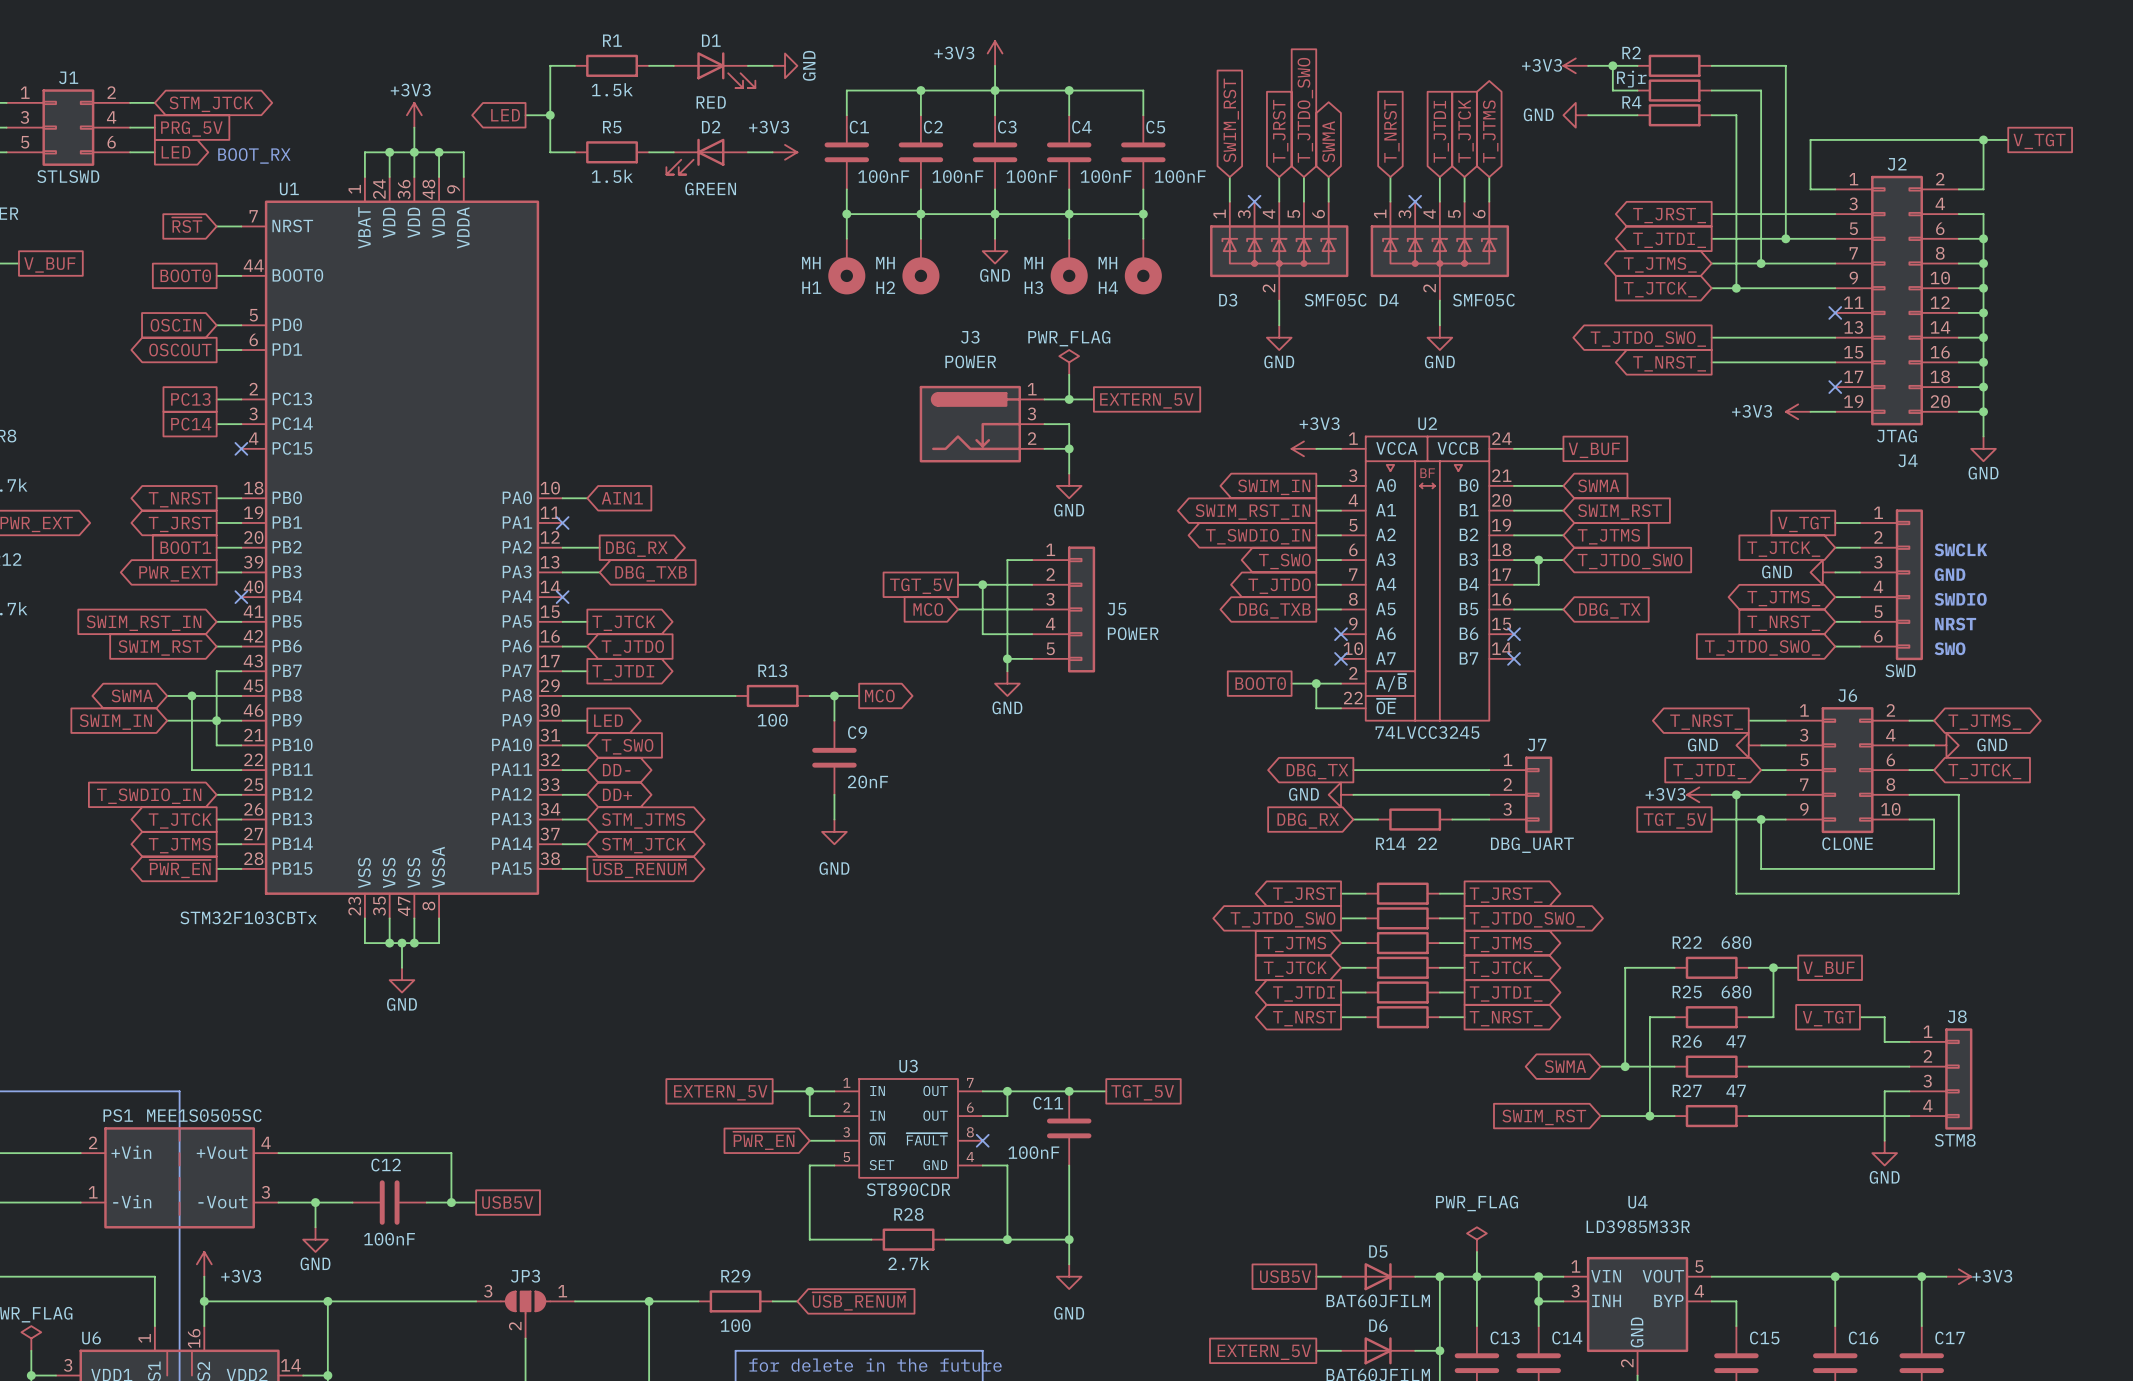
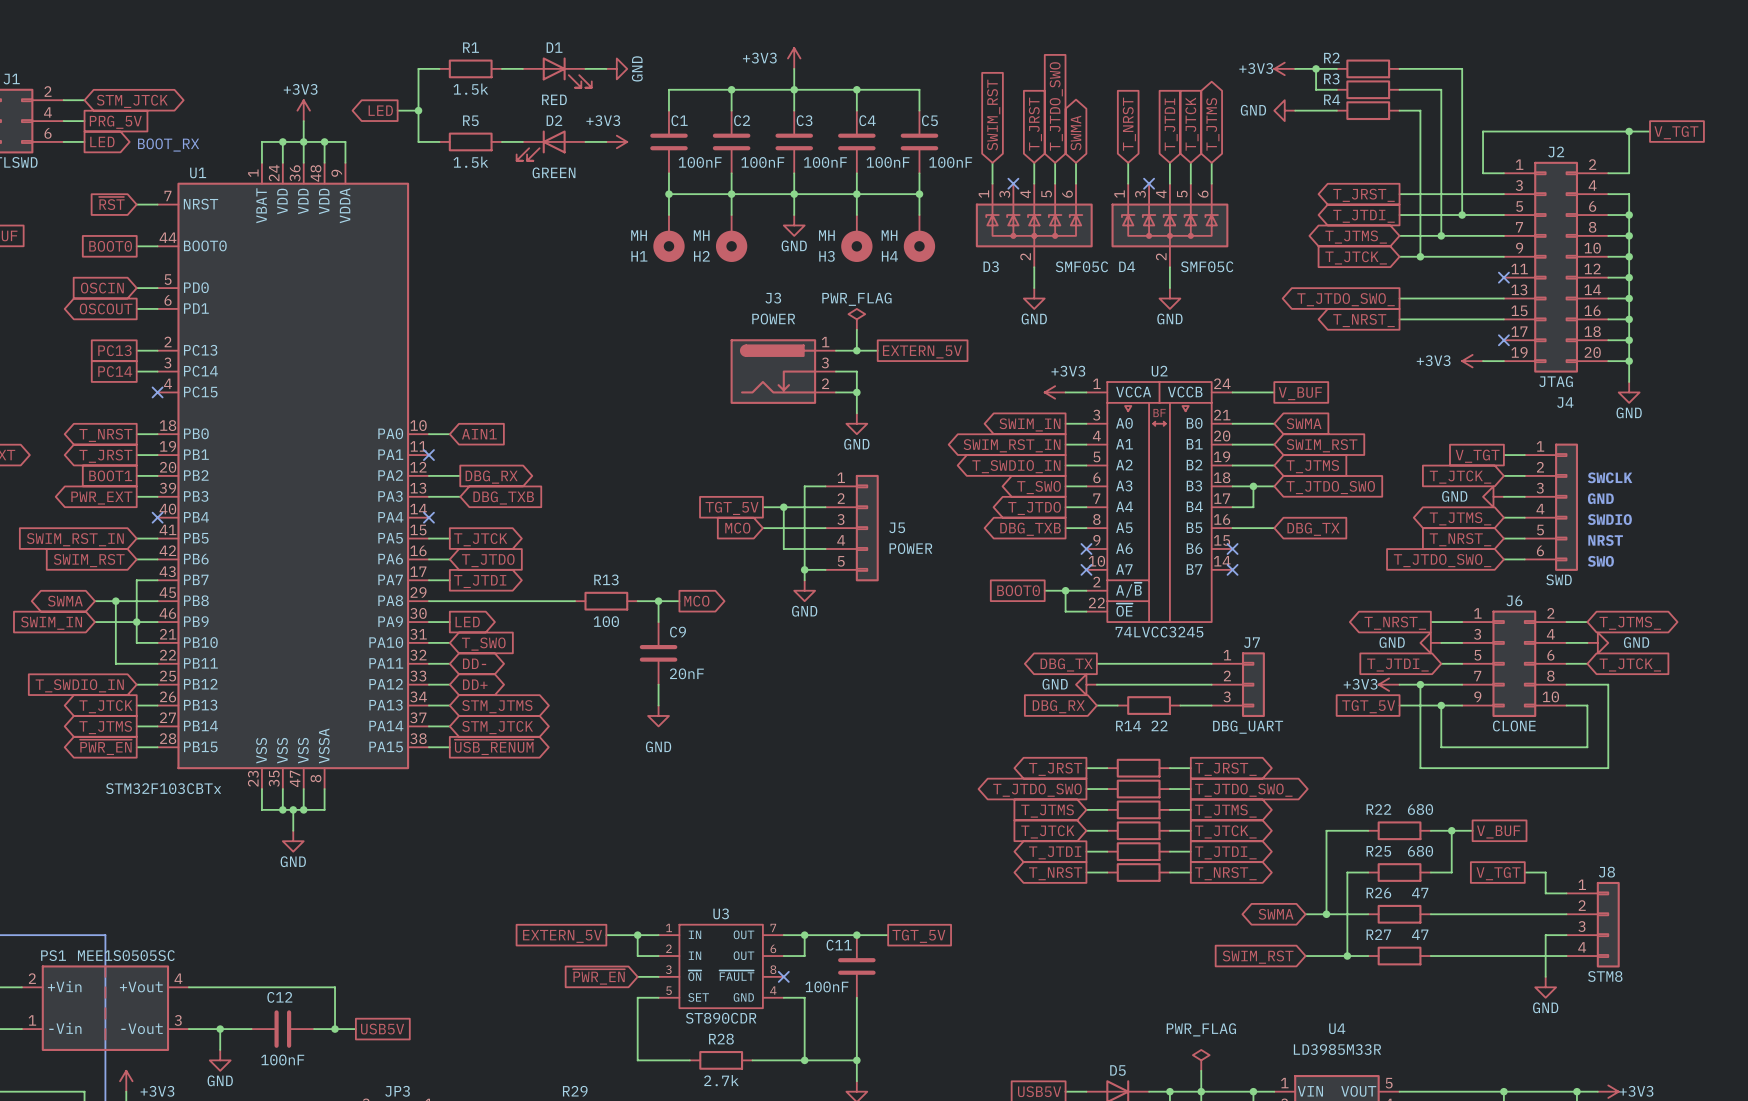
Rjr name: Rjr (1631, 79) -> R3 (1331, 78)

